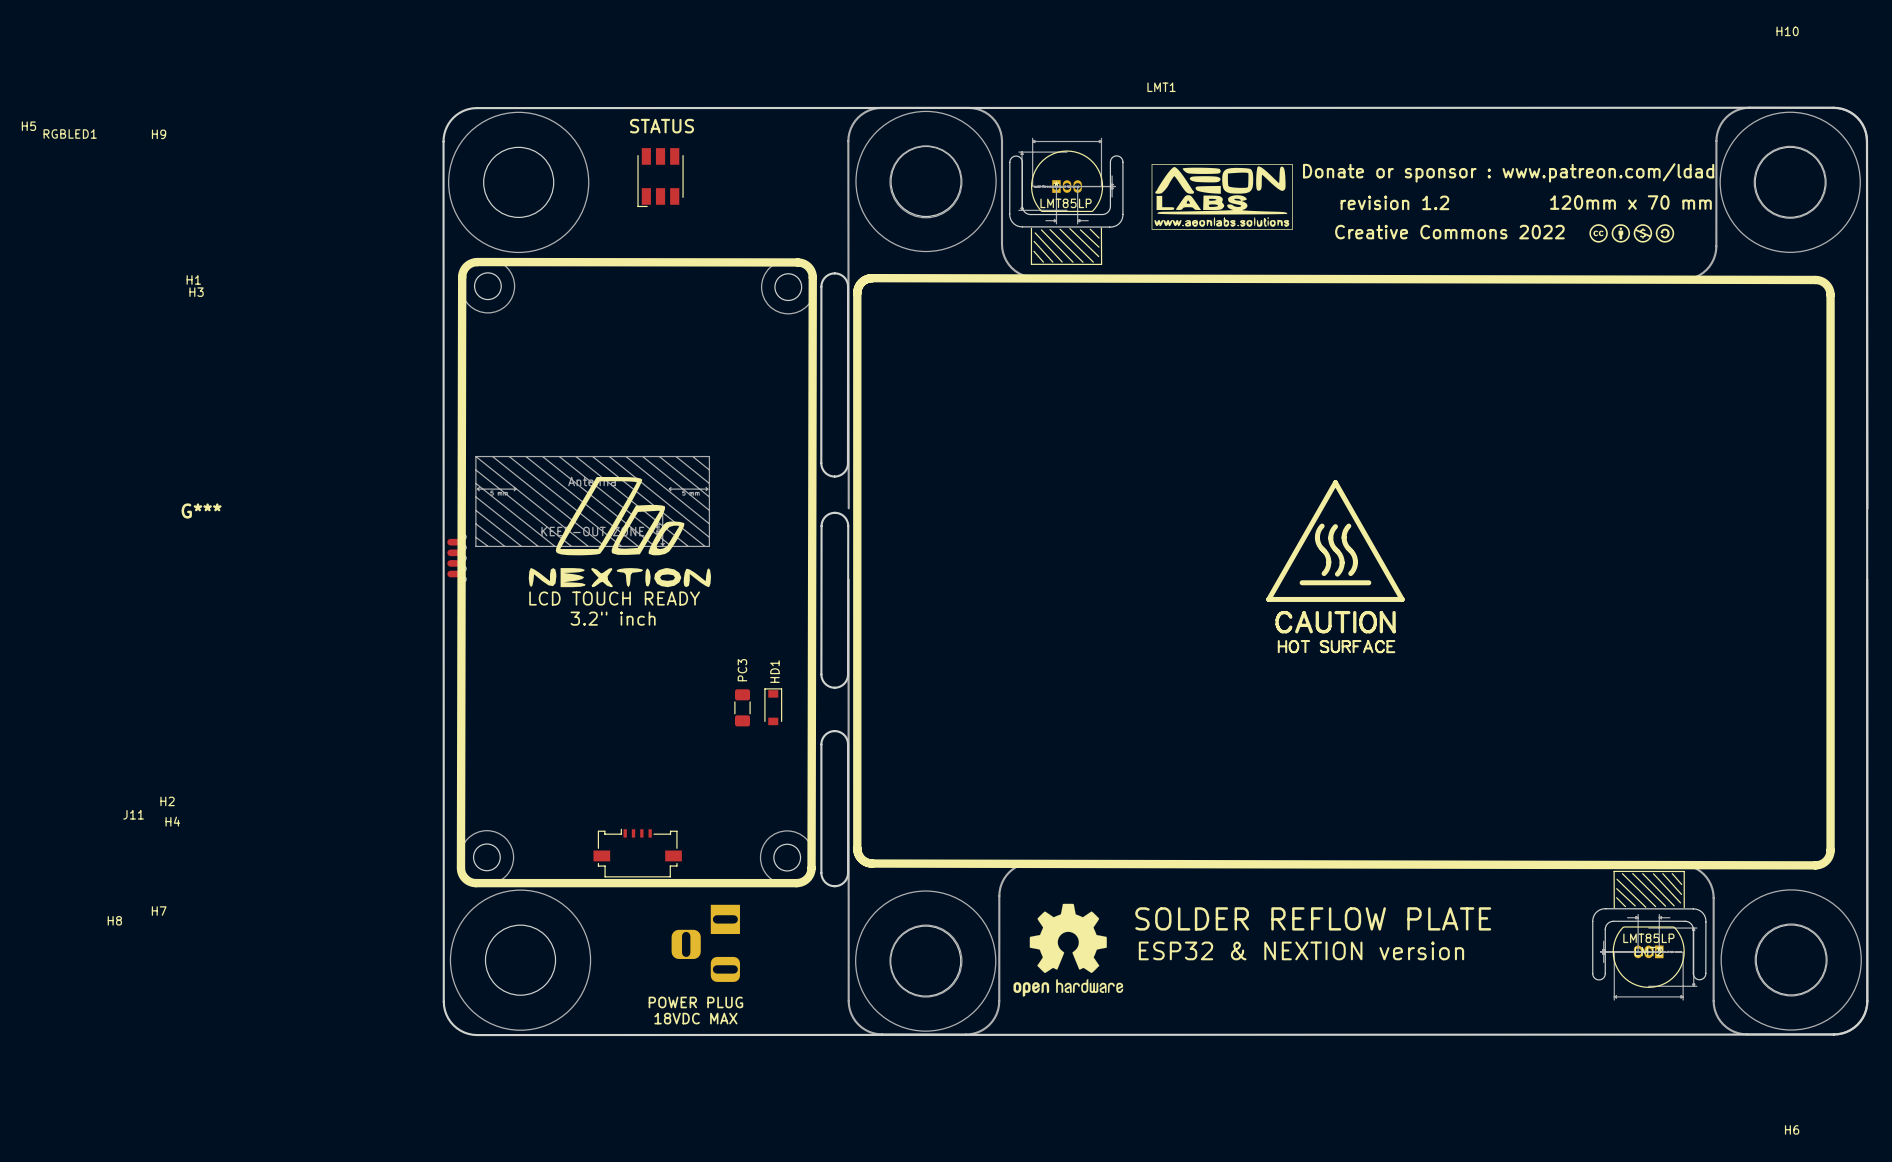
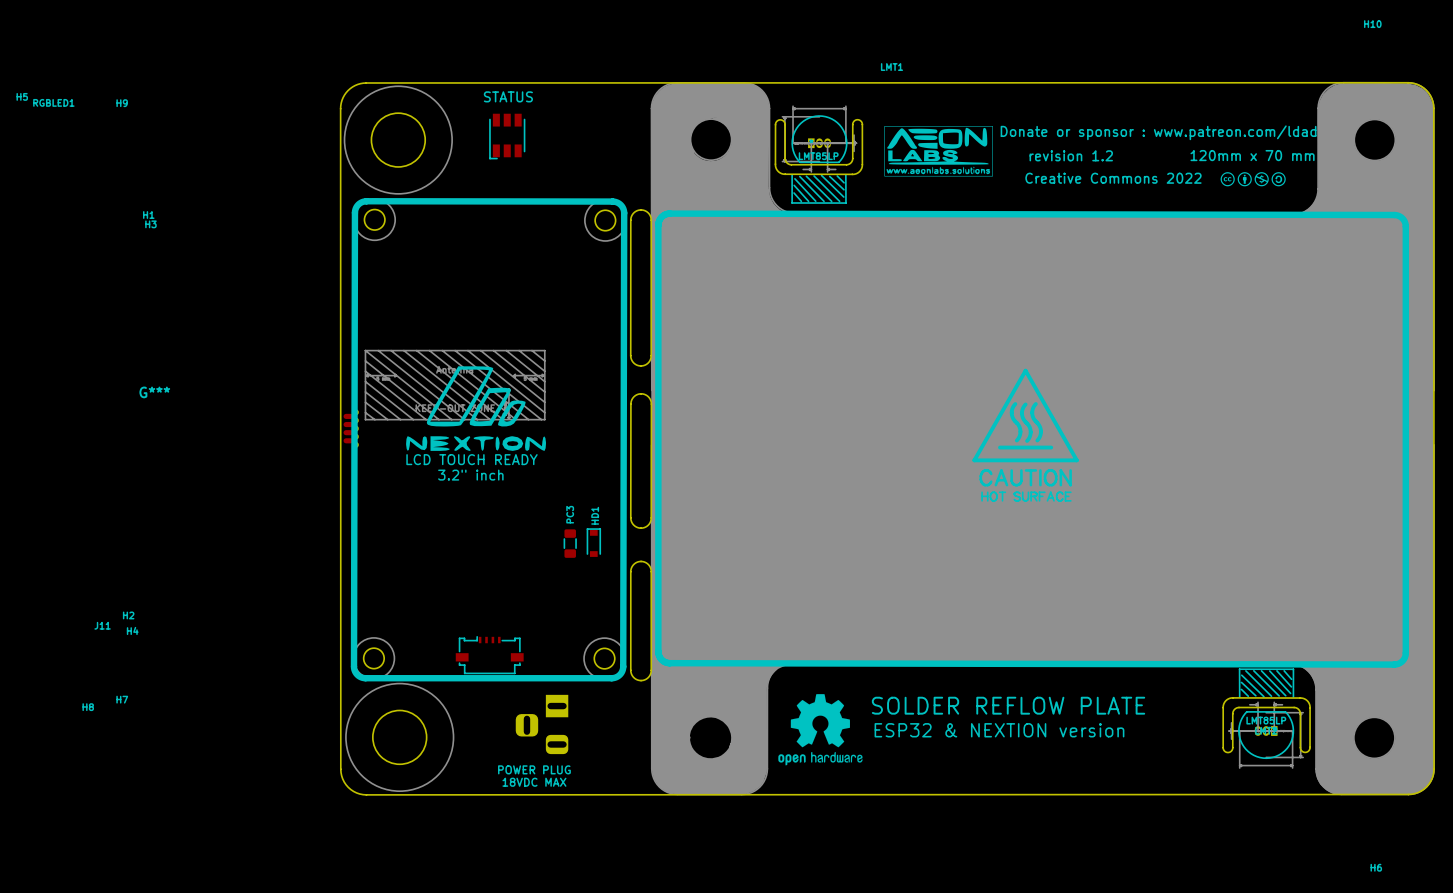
drawing: none -> [651, 82, 1434, 795]
drawing shape: [889, 145, 963, 219] -> [690, 118, 733, 161]
drawing shape: [1753, 145, 1827, 219] -> [1353, 119, 1396, 162]
drawing shape: [1754, 923, 1828, 997] -> [1353, 716, 1396, 759]

